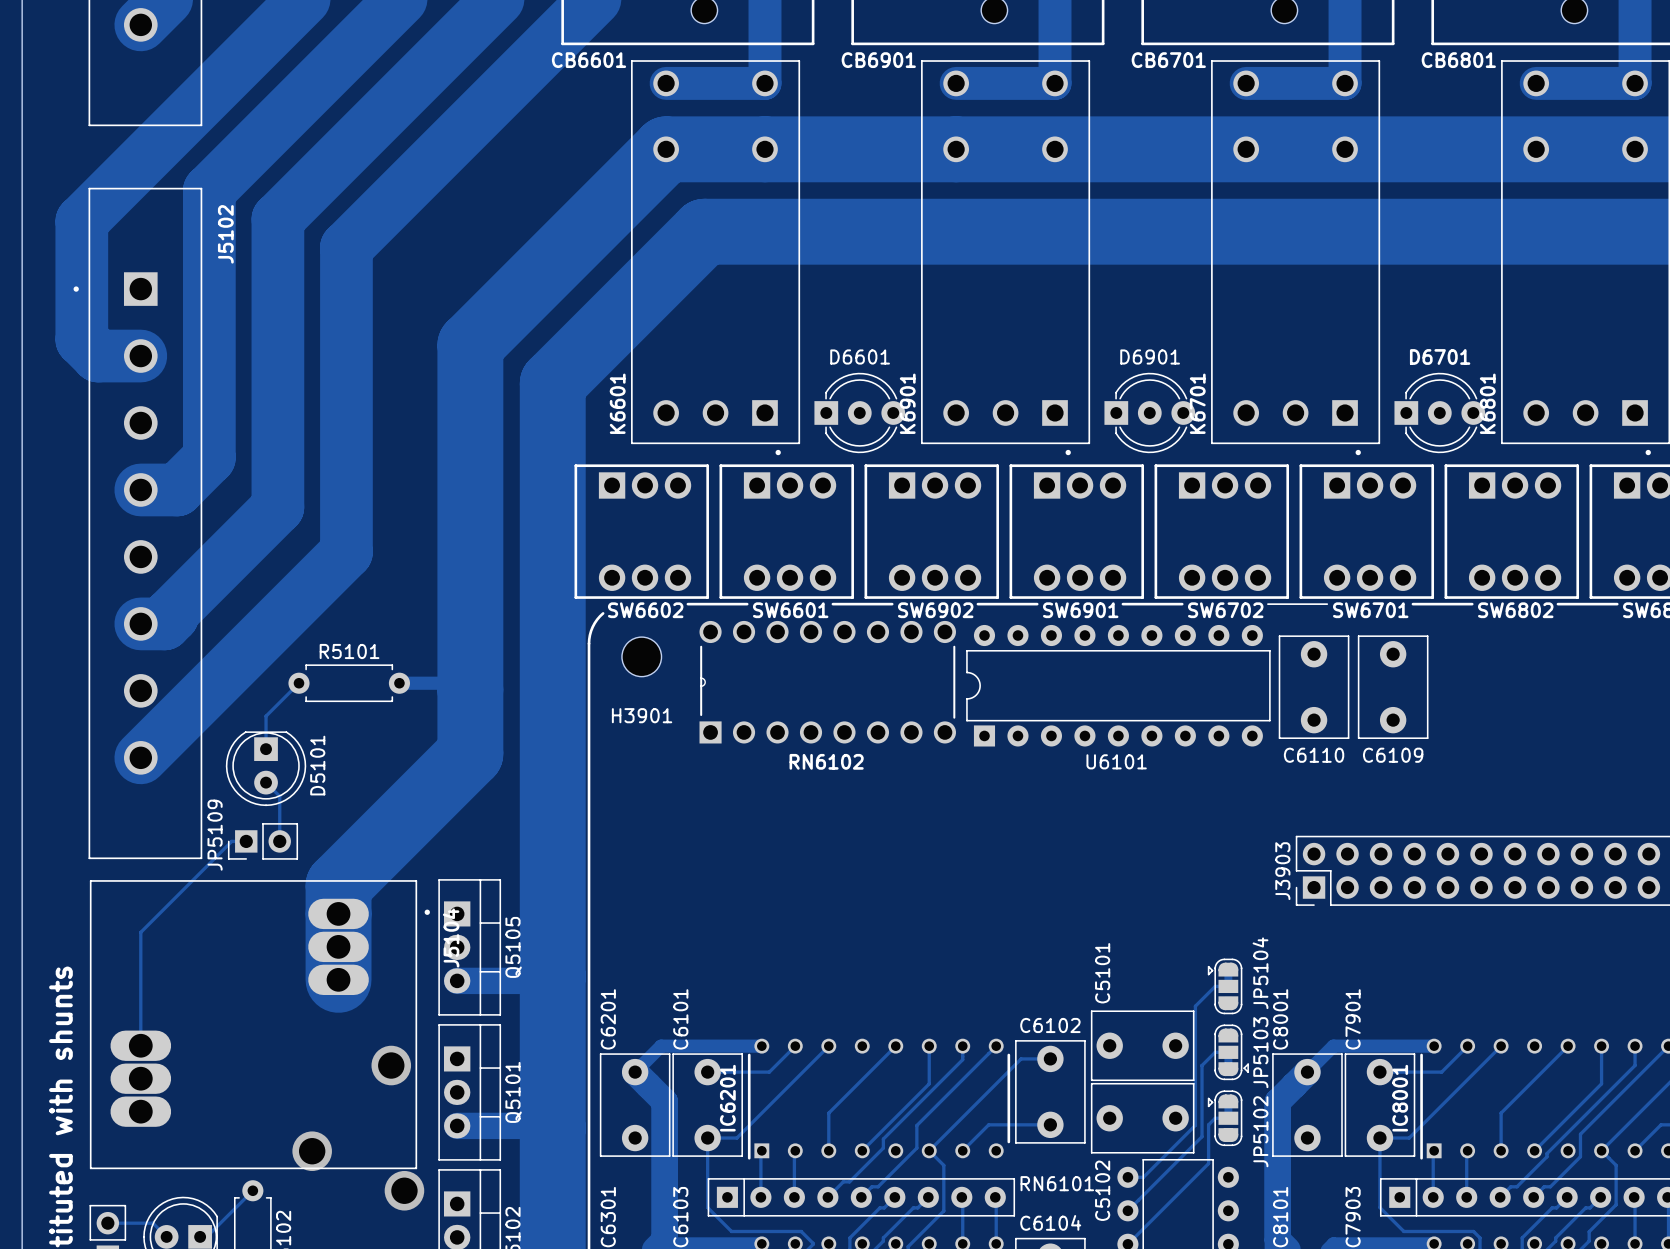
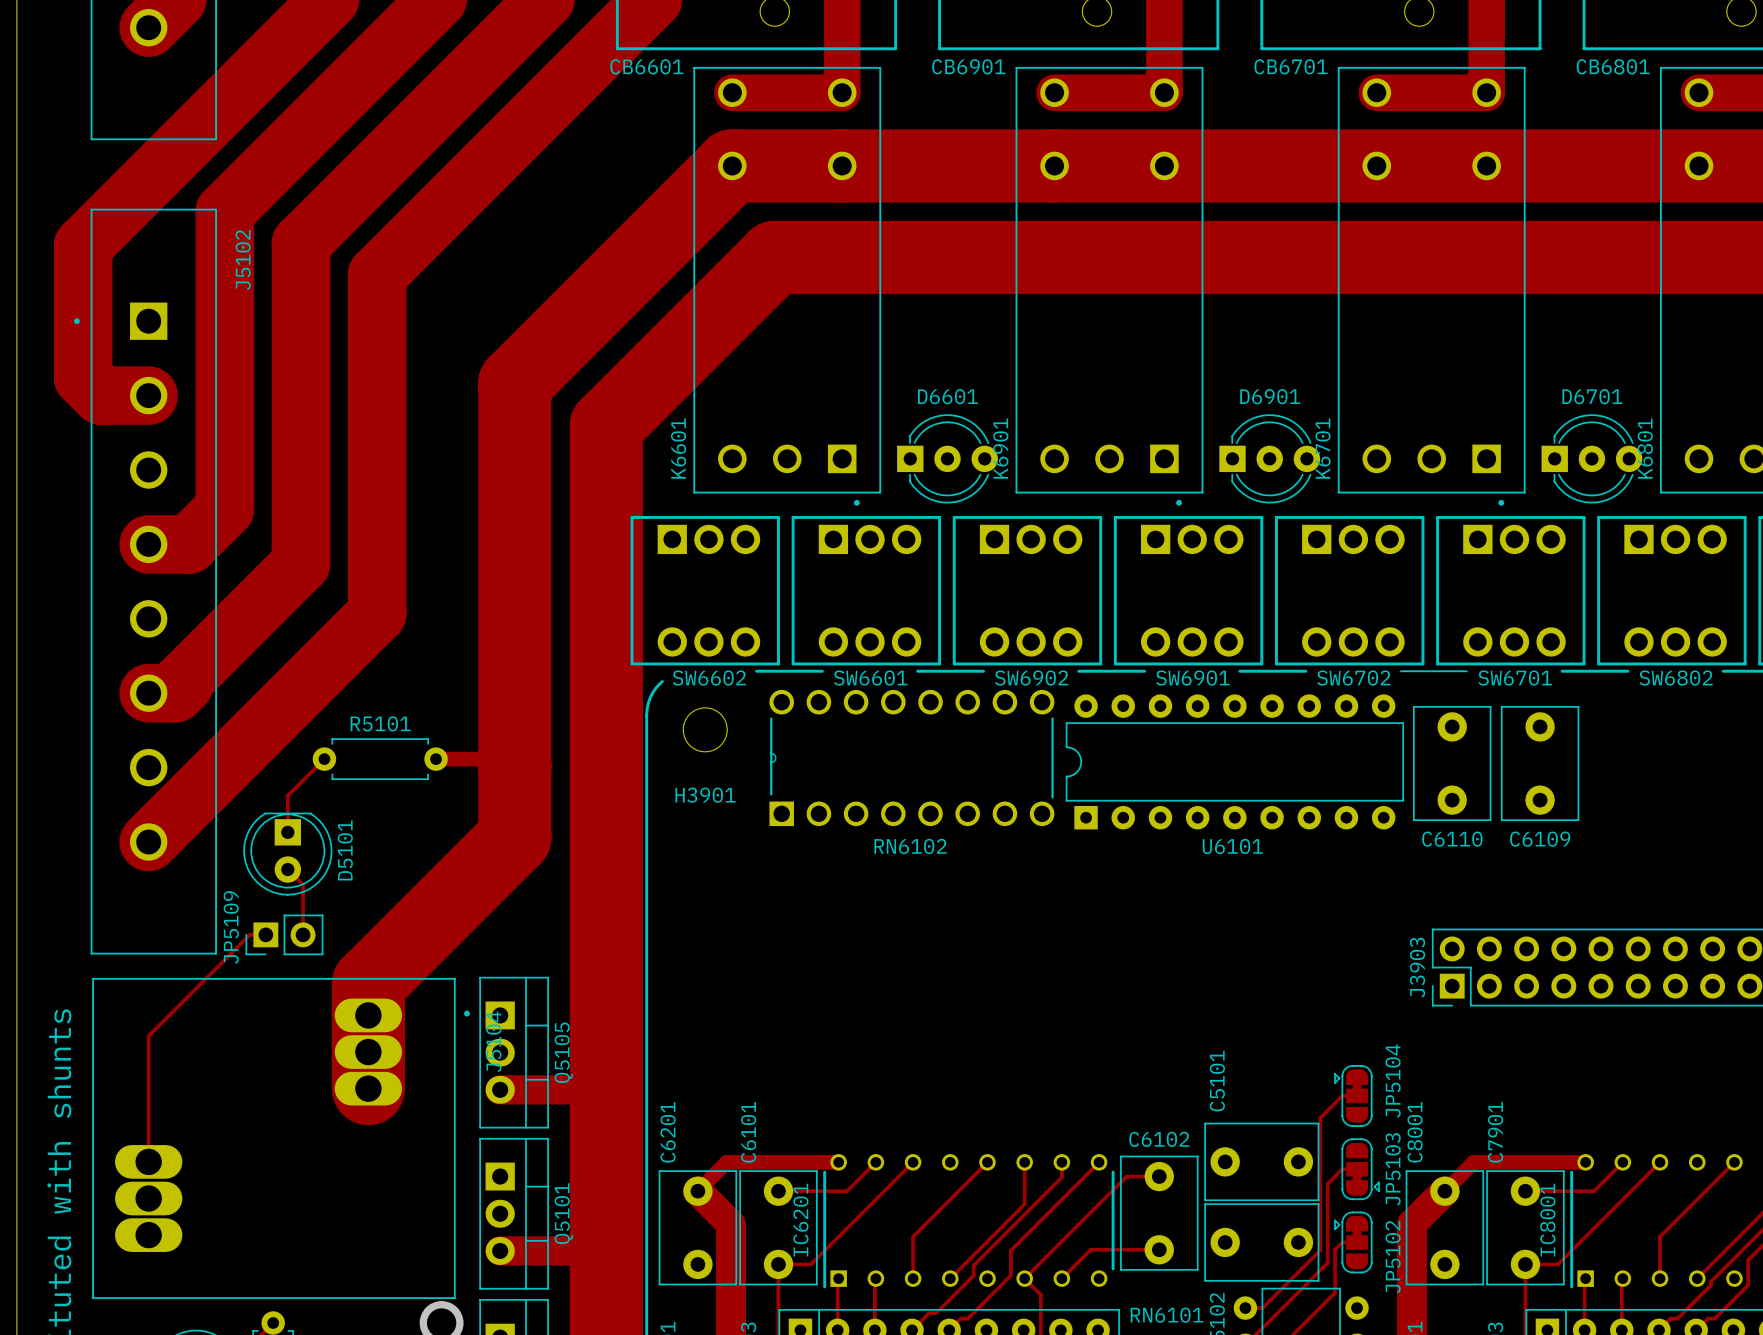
via: (391, 1065) -> none
via: (312, 1151) -> none

